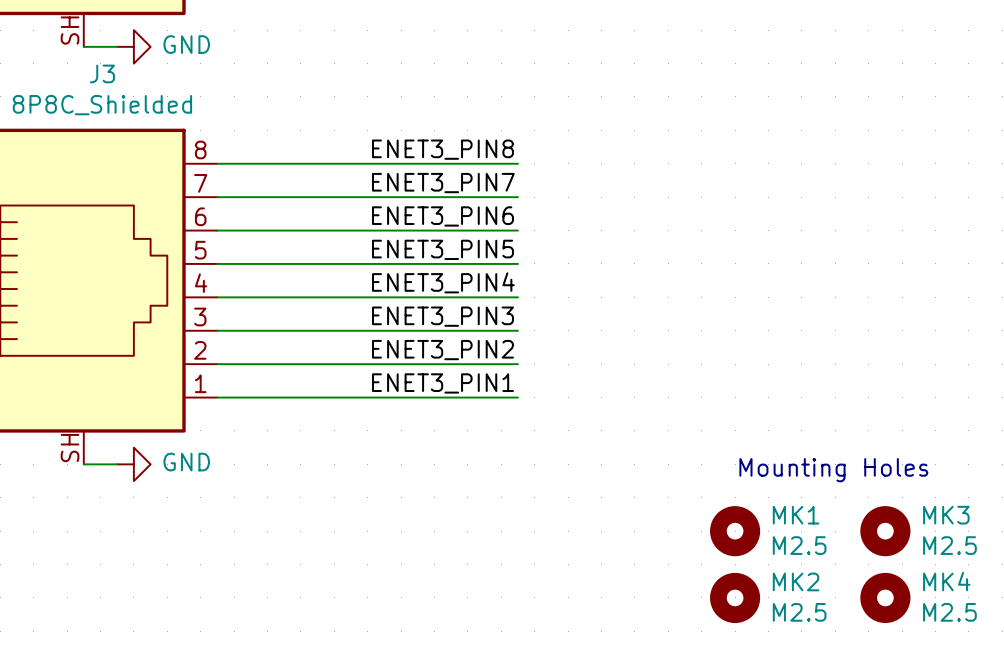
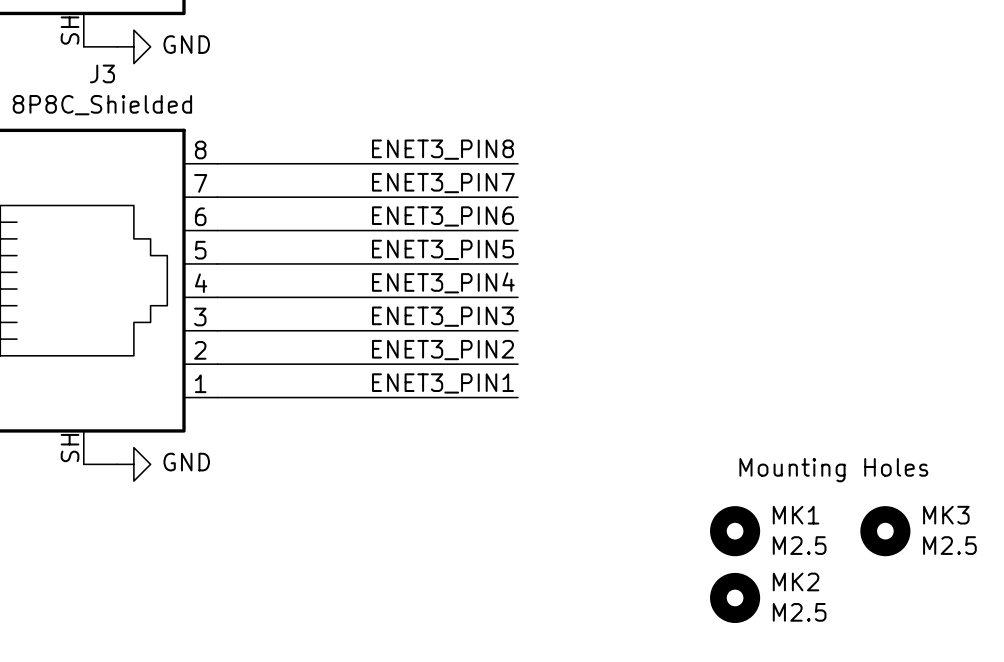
MK4: M2.5 (885, 597) -> none

